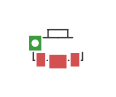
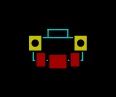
part footprint: [29, 29, 84, 69] -> [29, 29, 87, 69]

